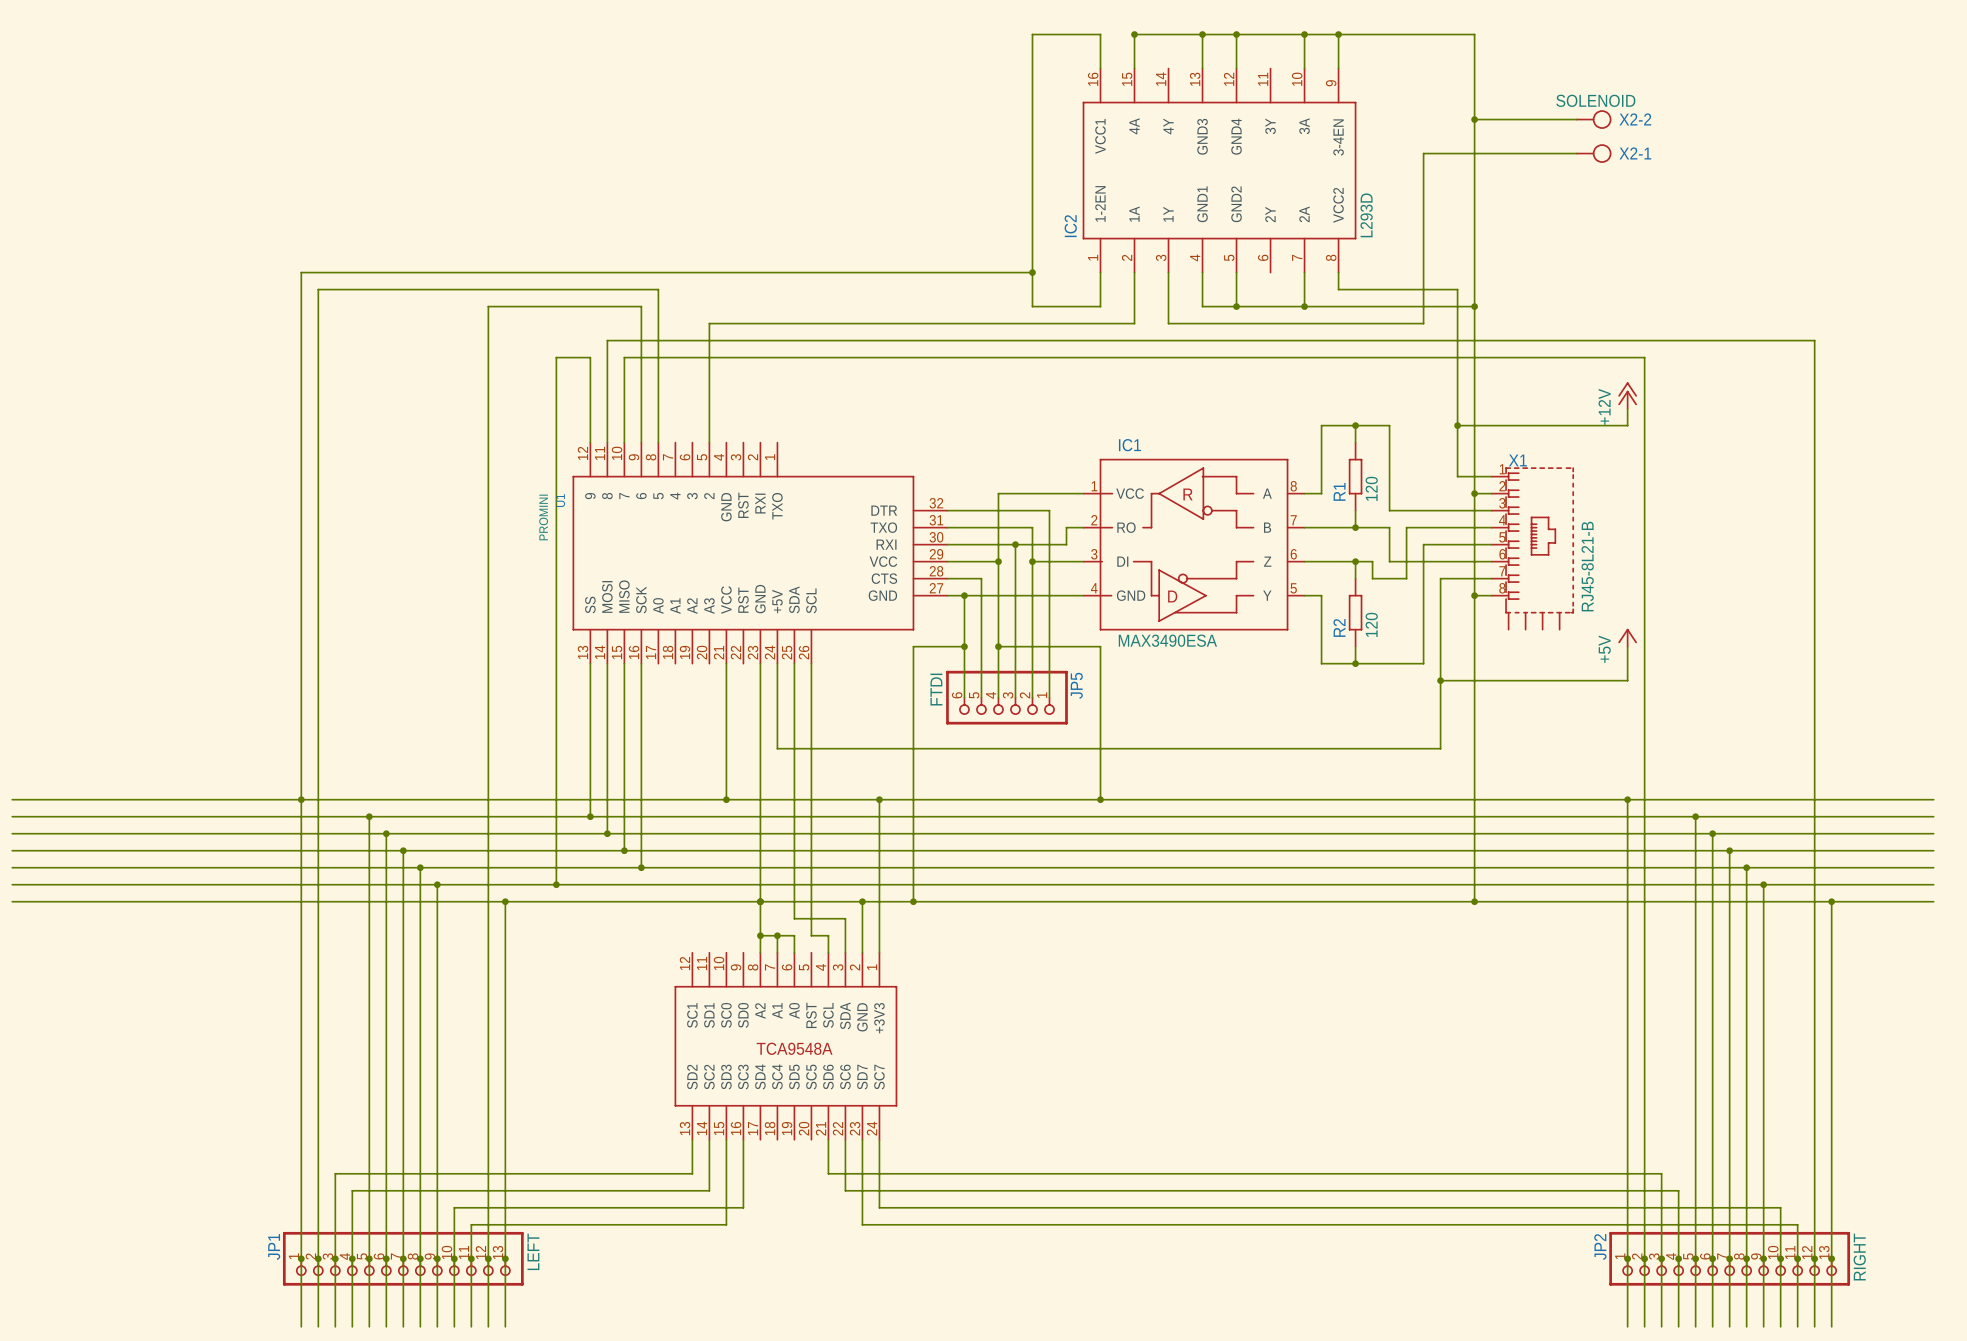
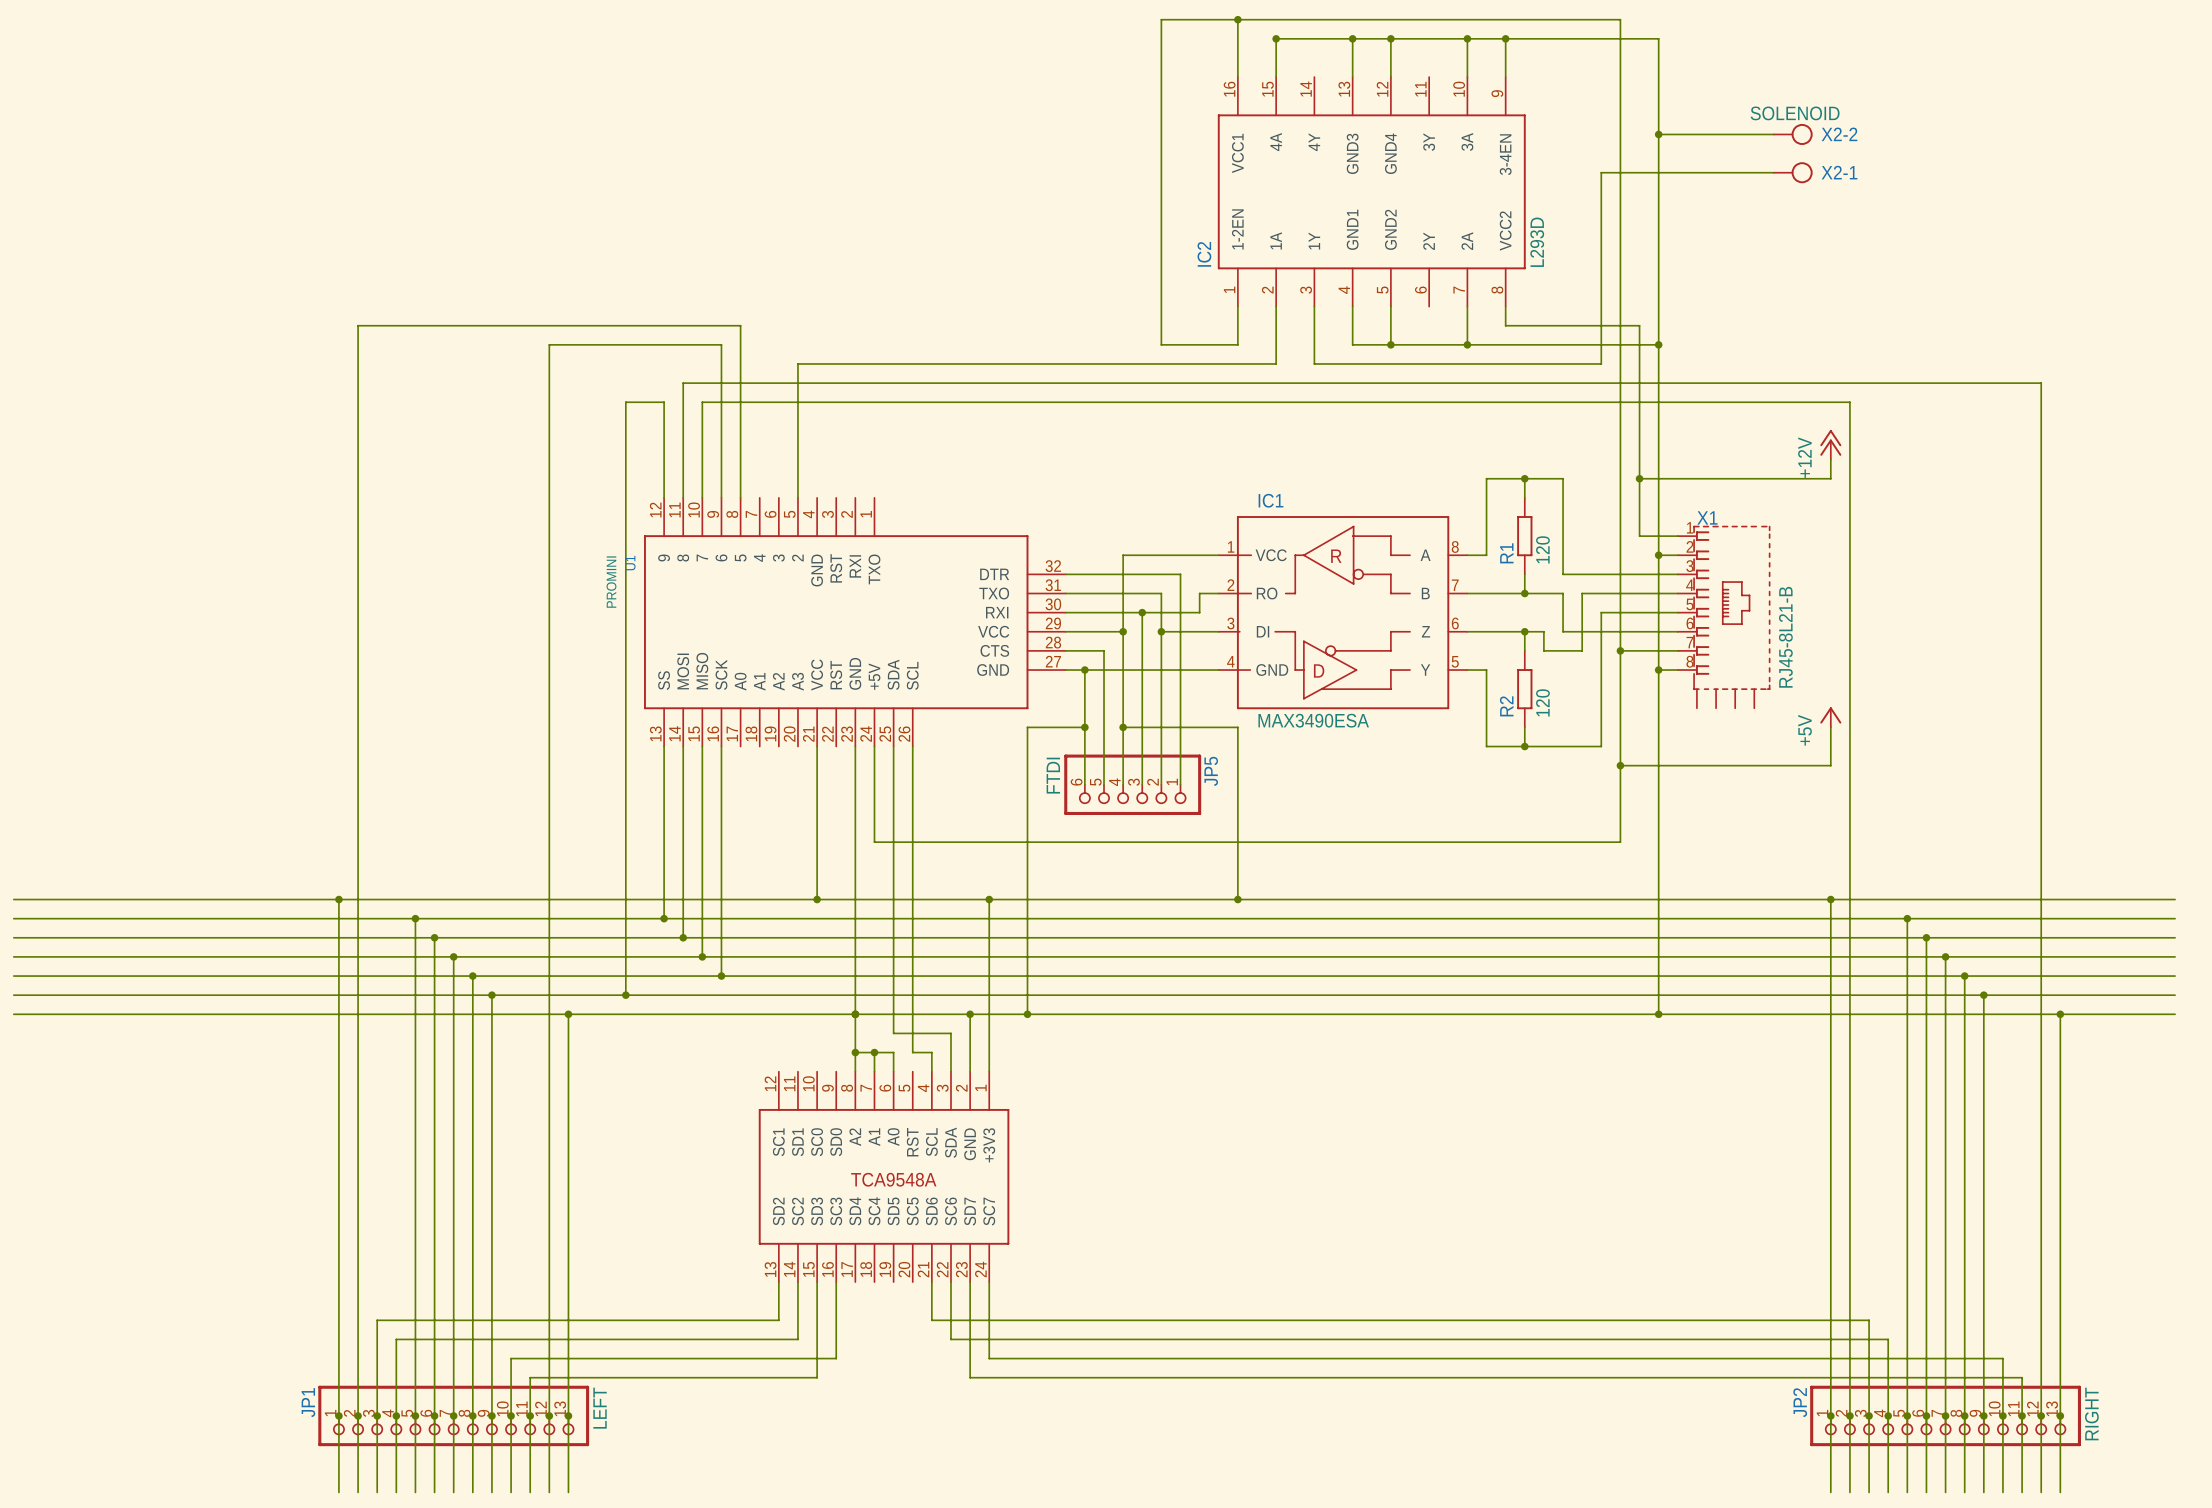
junction: none -> (1237, 19)
wire: (1032, 34) (1100, 34) -> (1237, 19) (1237, 38)
wire: none -> (1161, 38) (1161, 19) (1620, 19) (1620, 650)
wire: (1032, 272) (301, 272) (301, 799) -> none
junction: (1032, 272) -> none
junction: none -> (1620, 650)

